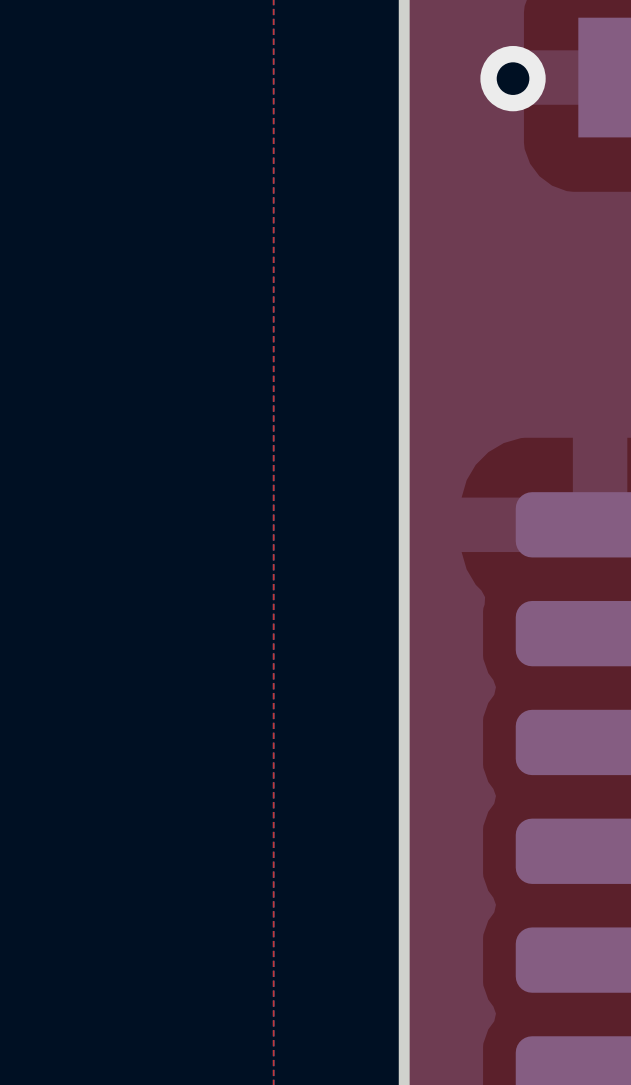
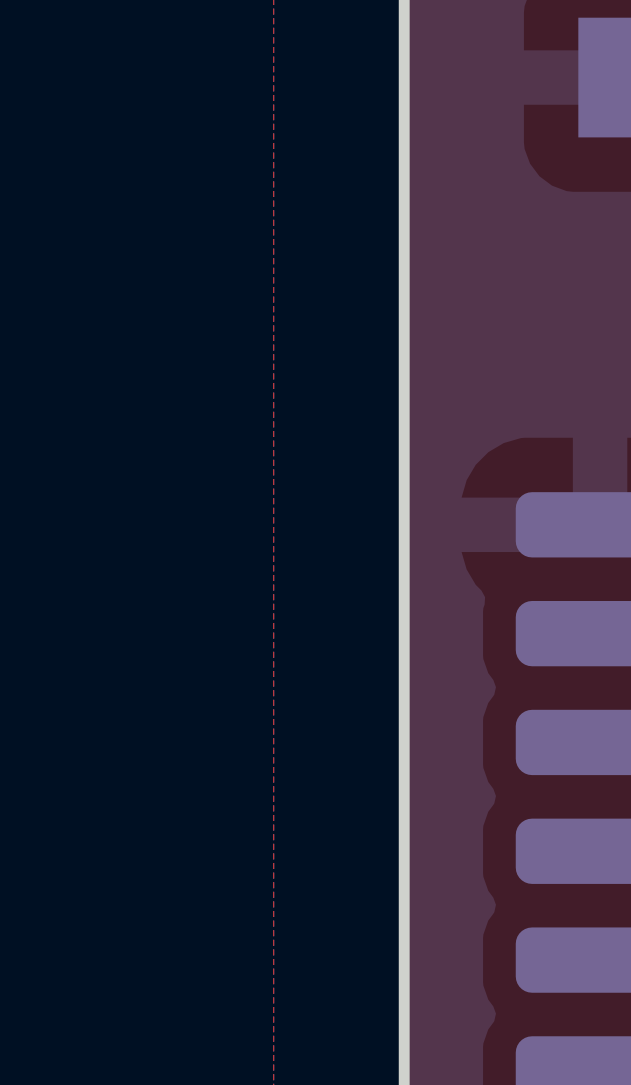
via: (513, 78) -> none

